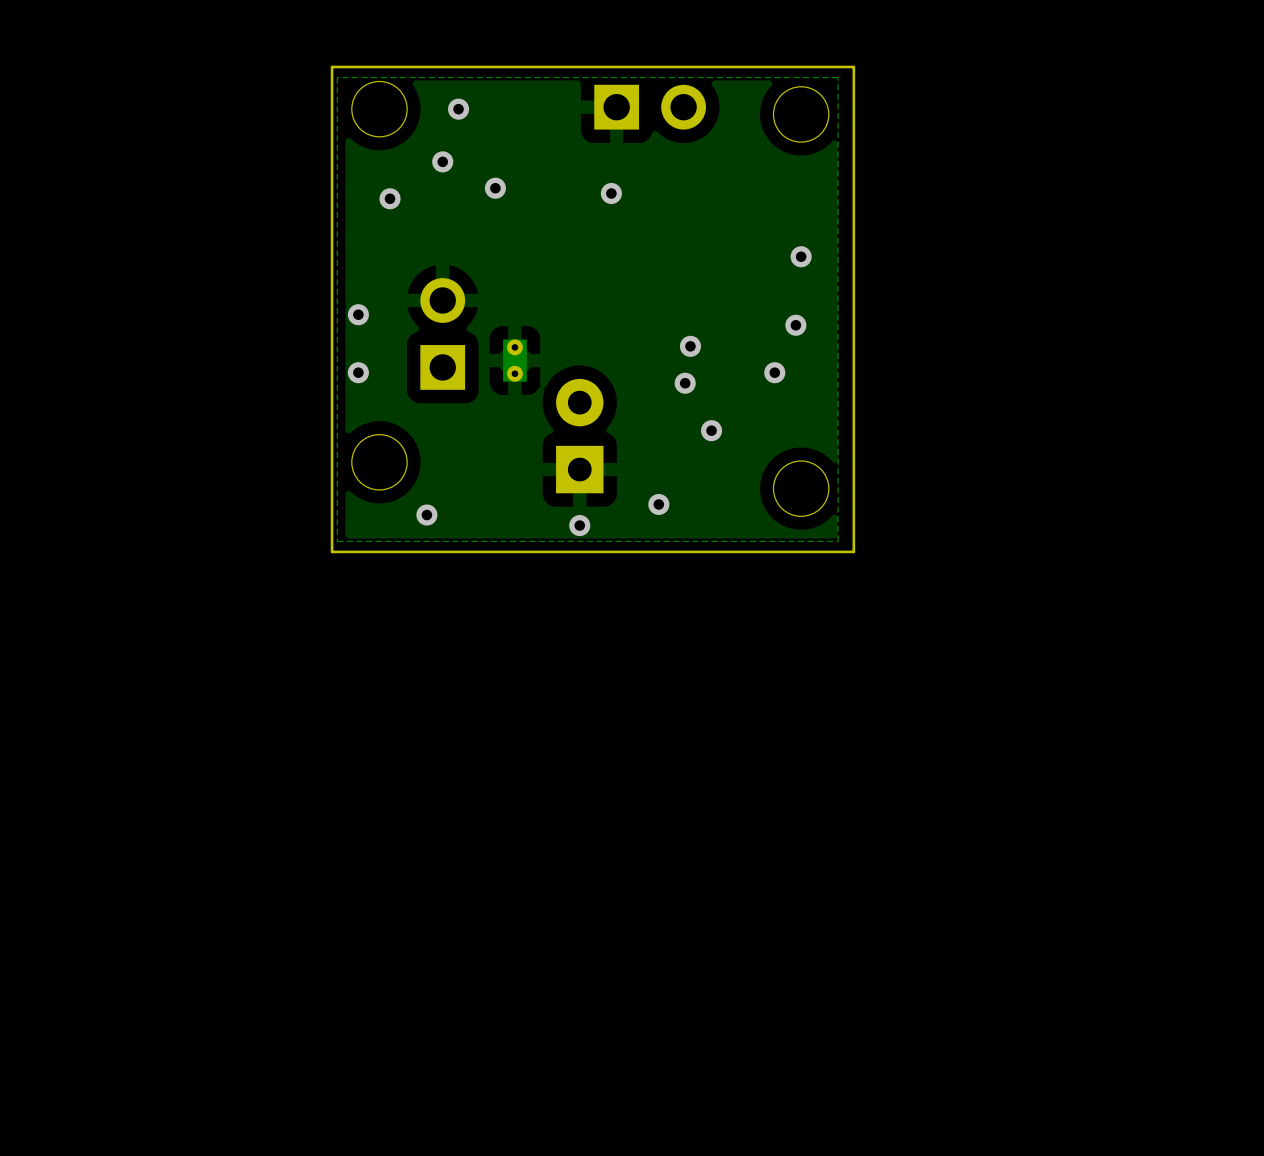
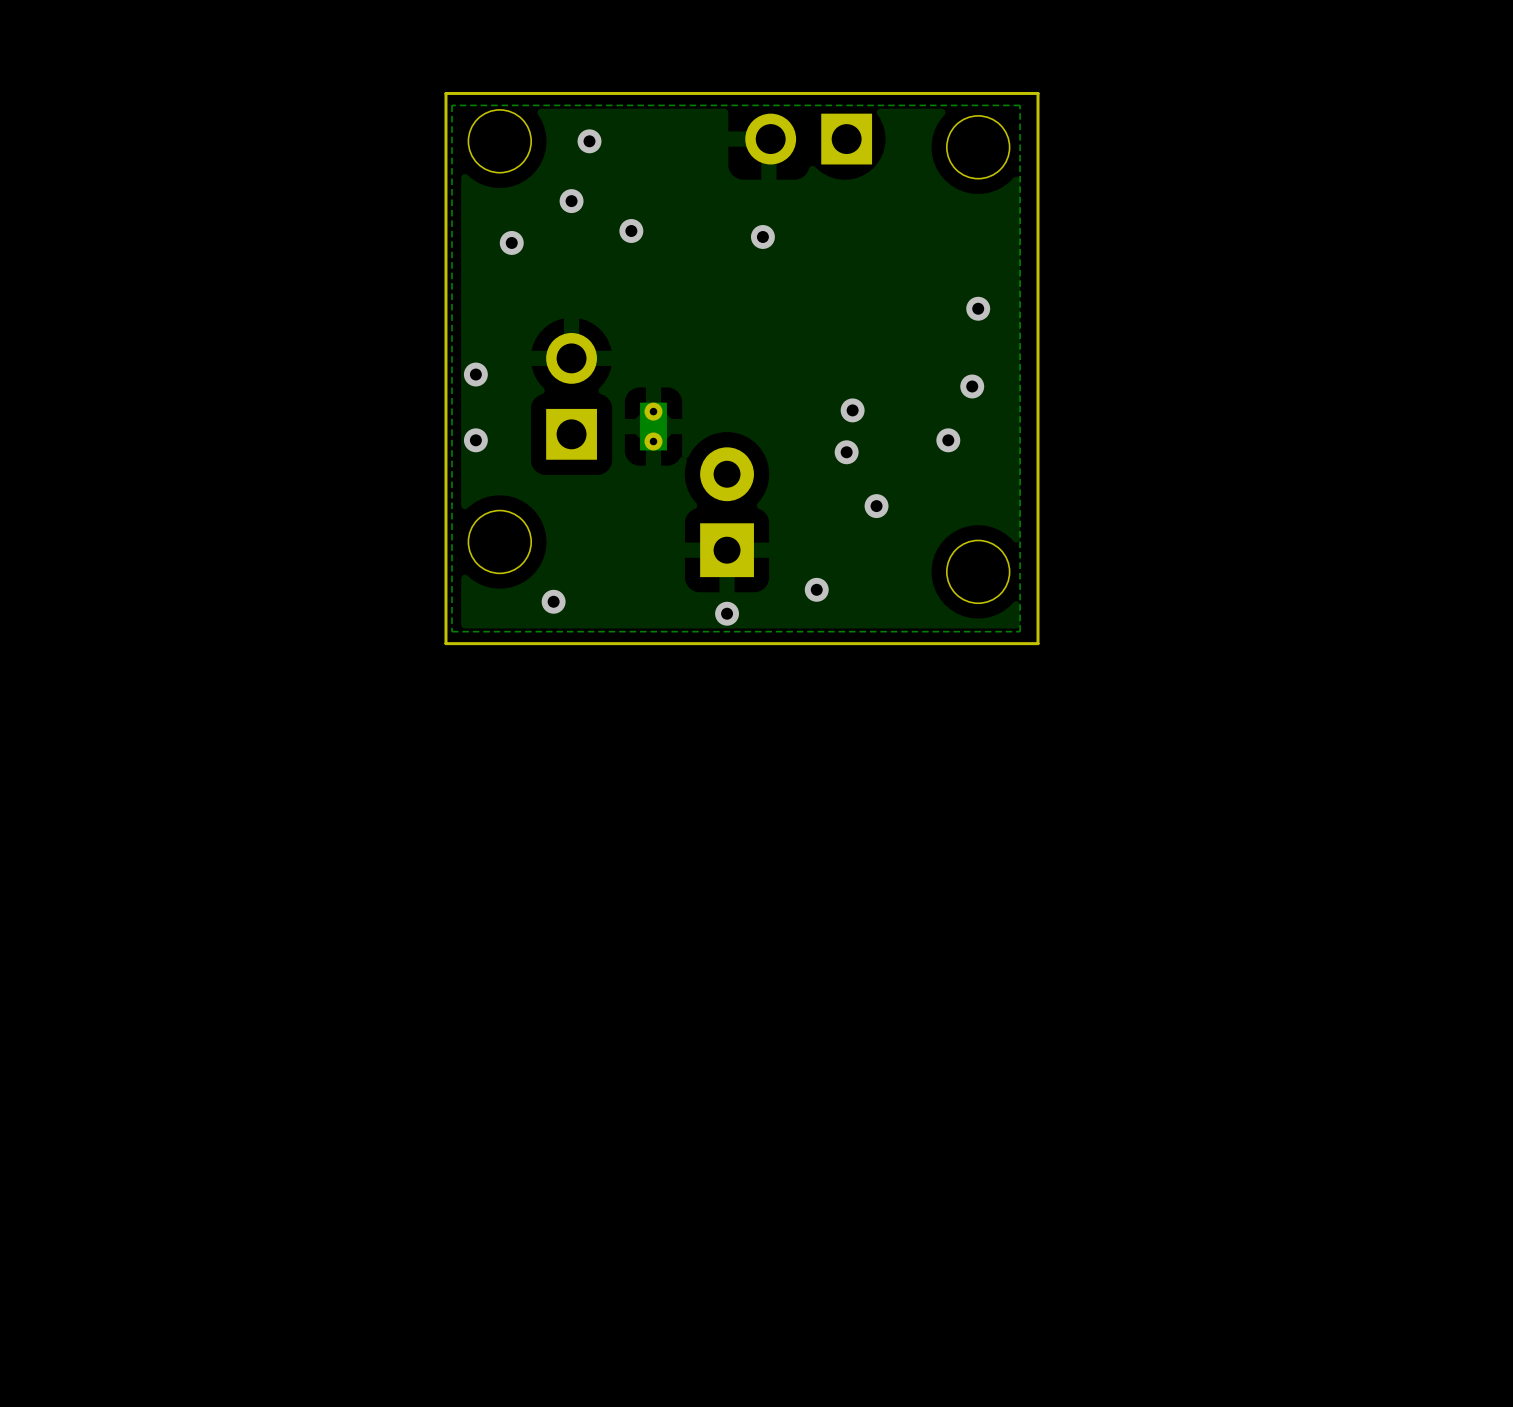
part rotation: 0° (650, 107) -> 180° (808, 139)

